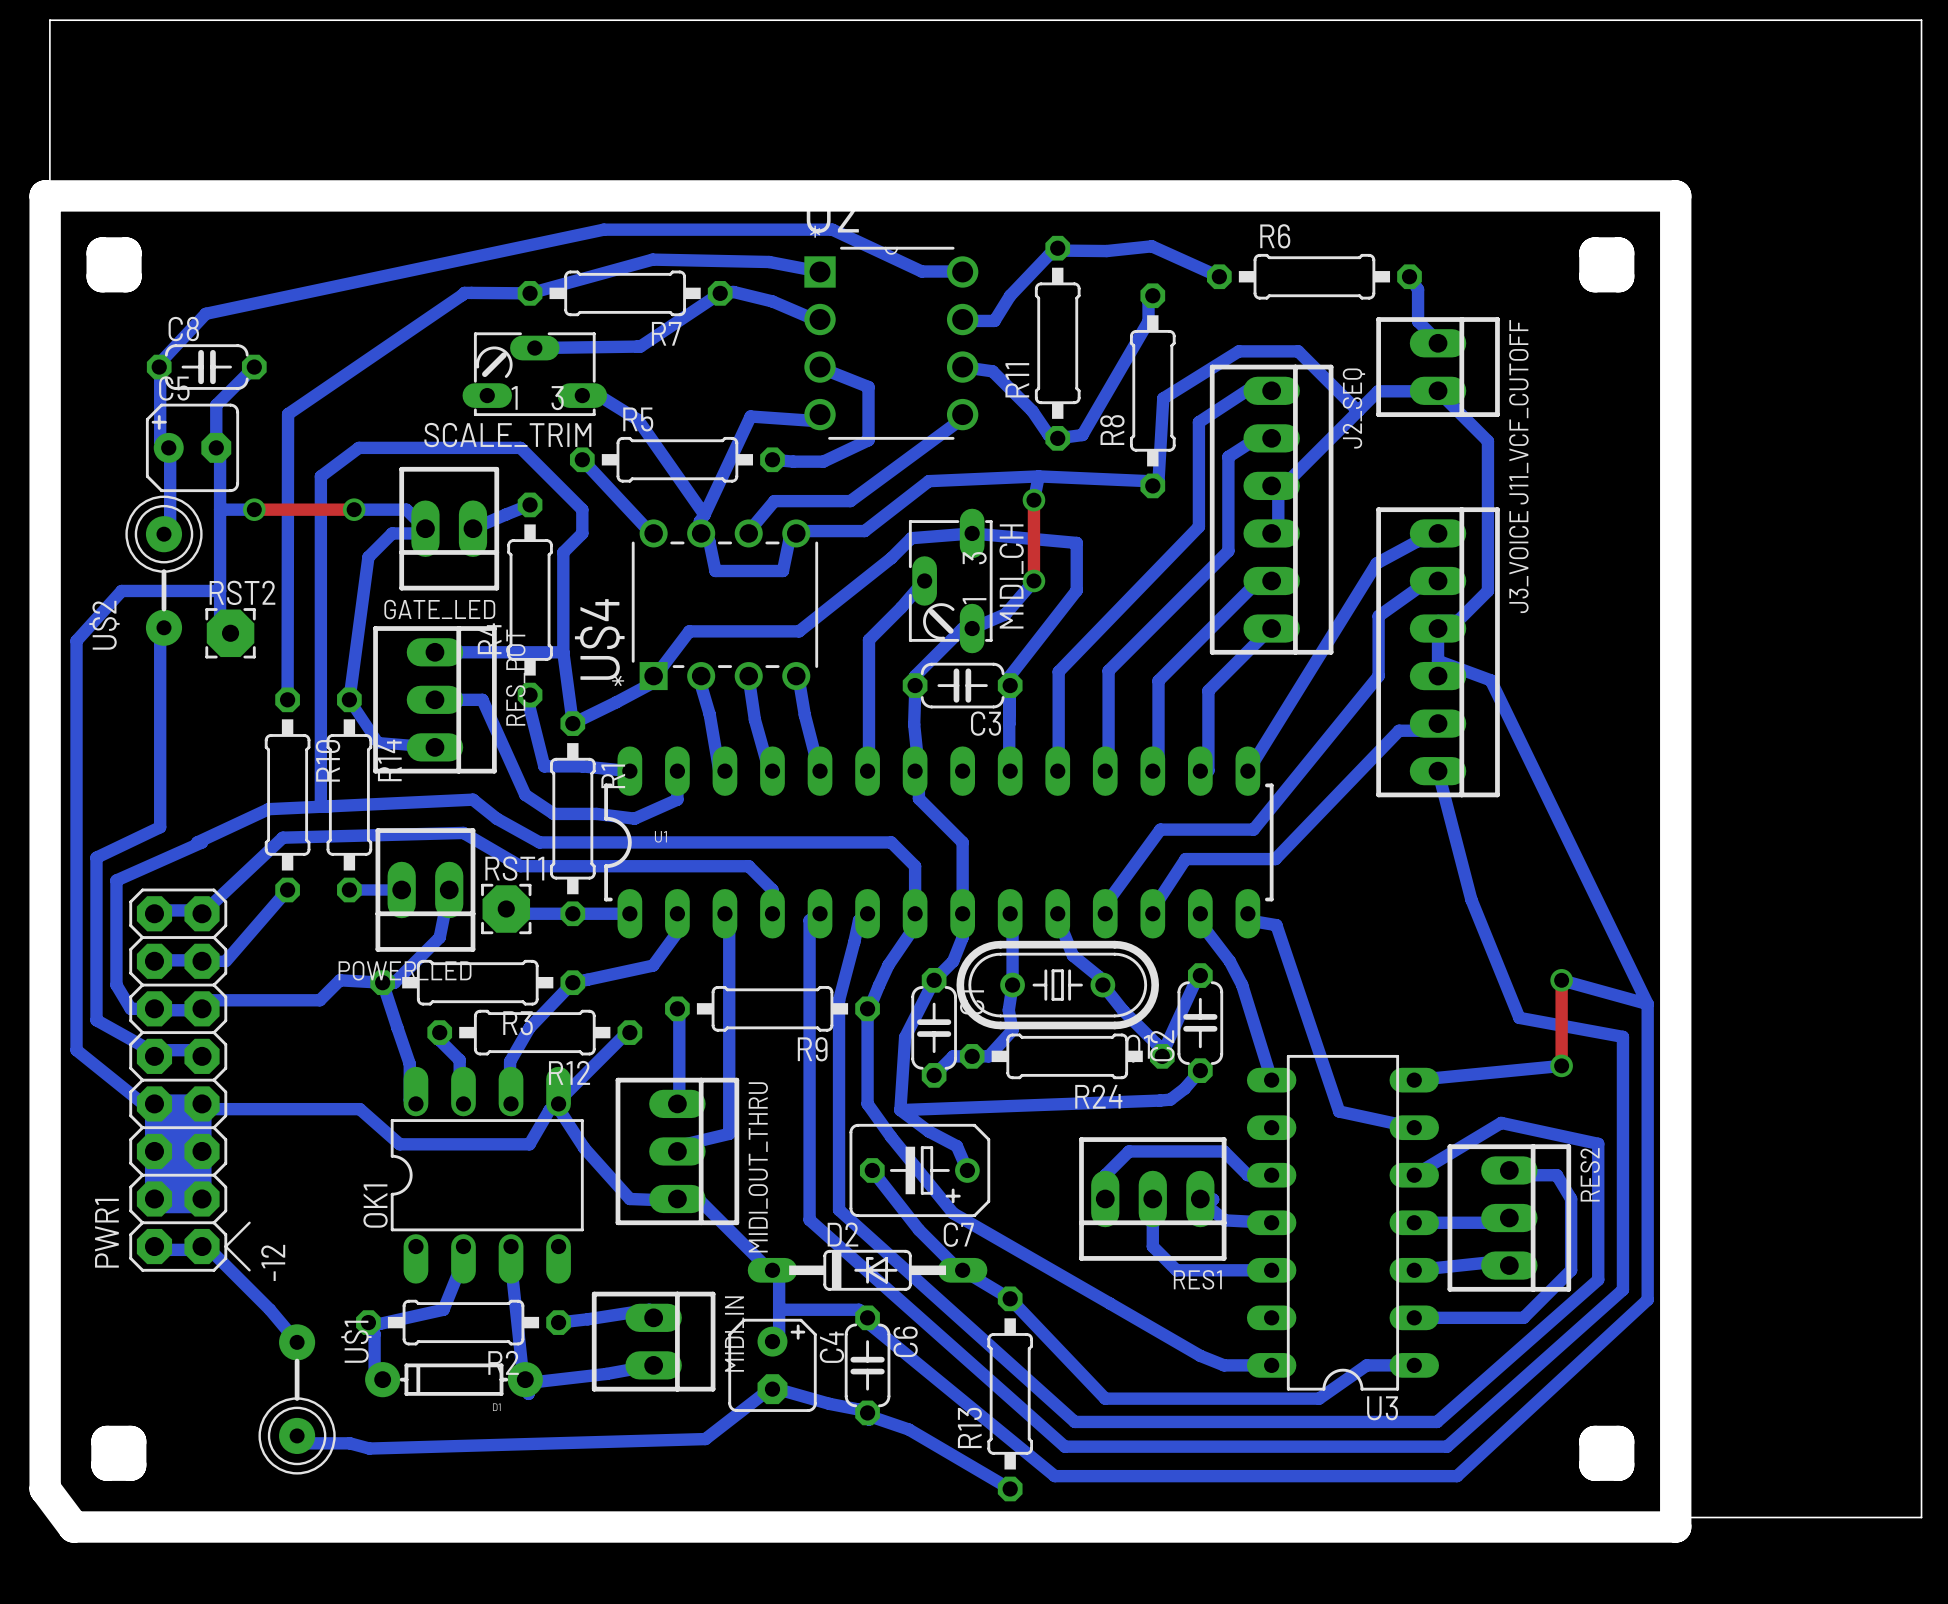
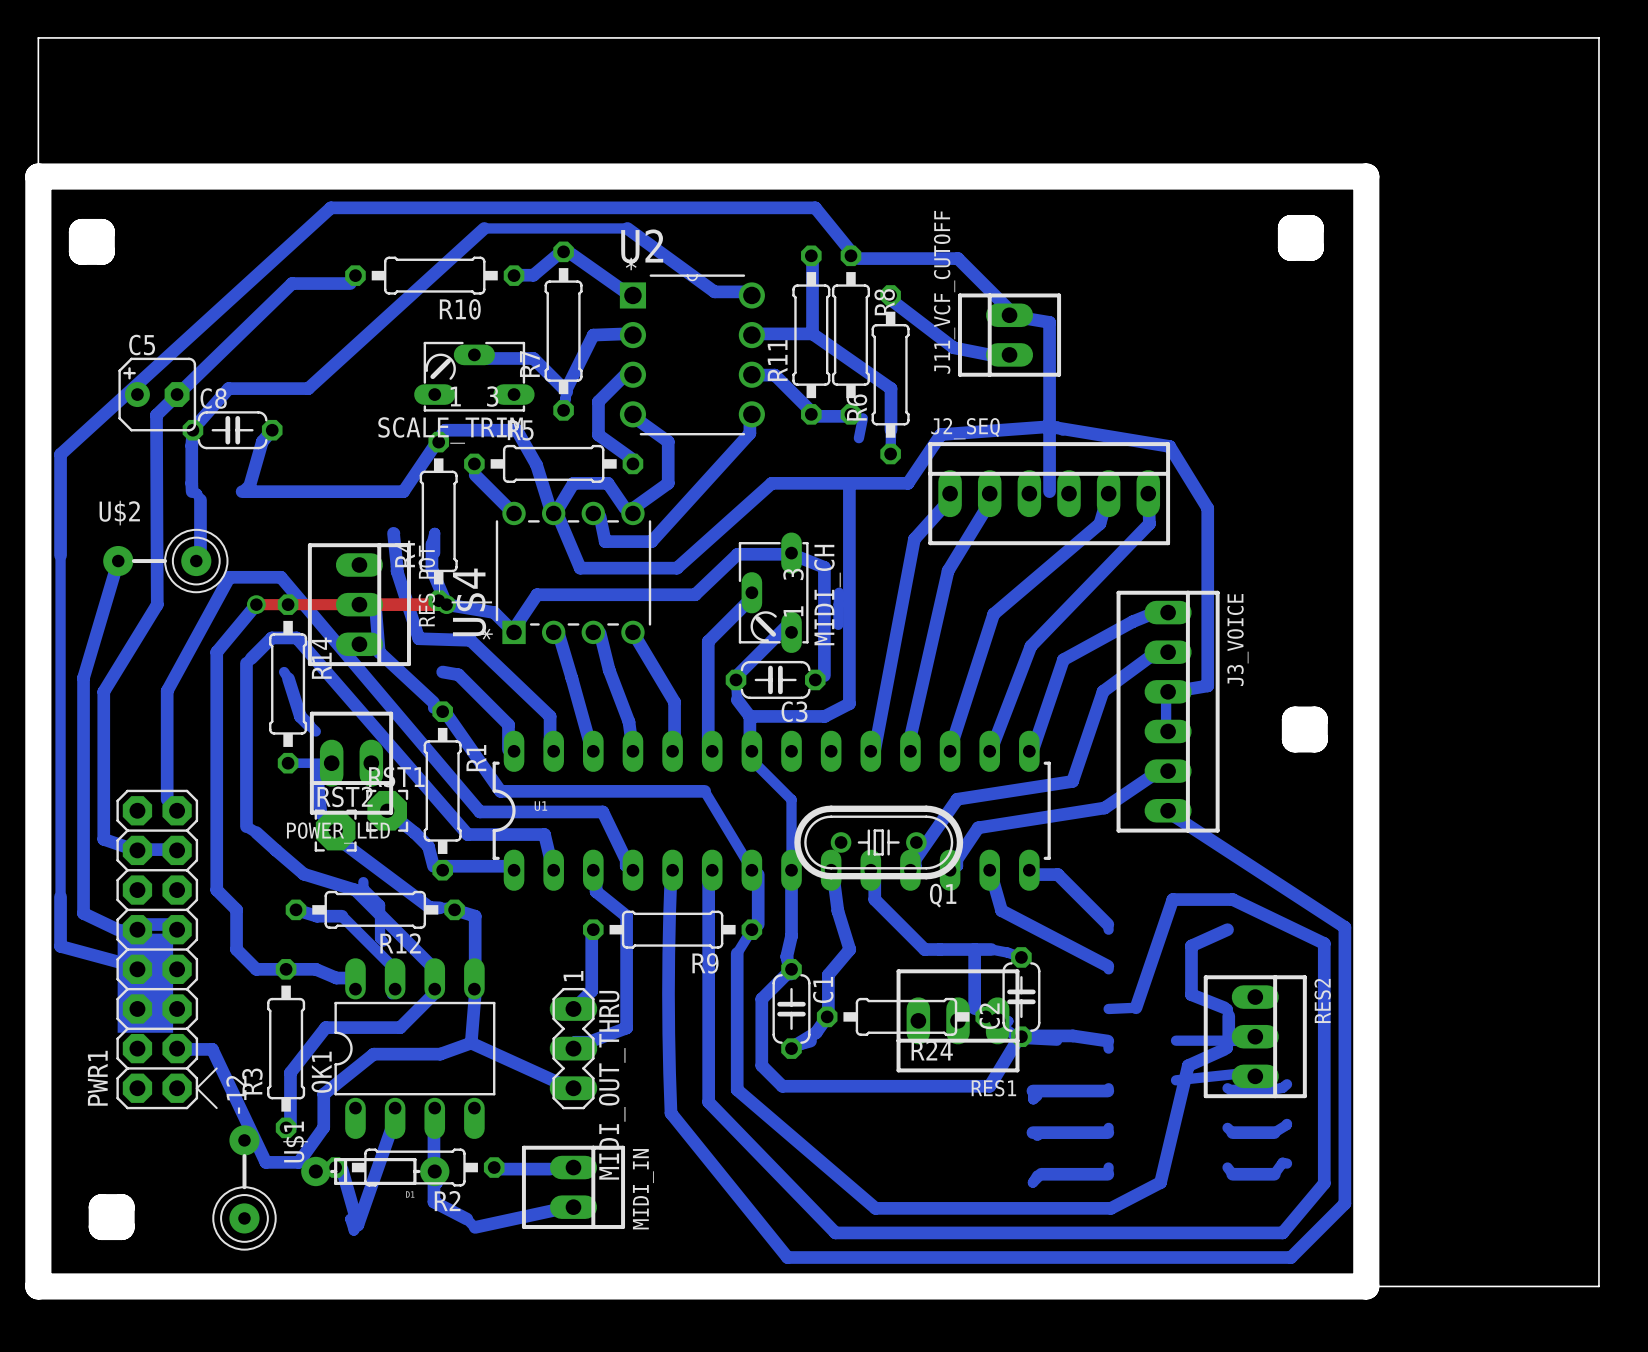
board edge: (45, 195) (1675, 195) (1675, 1527) (73, 1527) (45, 1488) (45, 195) -> (38, 176) (38, 1286) (1366, 1286) (1366, 176) (38, 176)
R6 name position: R6 (1275, 236) -> R6 (856, 407)
board edge: (1594, 252) (1618, 252) (1618, 276) (1594, 276) (1594, 252) -> (1290, 228) (1310, 228) (1310, 247) (1290, 247) (1290, 228)
bottom track: (820, 271) (769, 262) (652, 259) (530, 293) (464, 292) (288, 414) (287, 699) -> none
bottom track: (962, 271) (921, 271) (832, 229) (603, 229) (205, 313) (158, 364) (160, 371) (160, 441) (170, 451) (170, 531) (163, 534) -> none
bottom track: (1219, 276) (1151, 246) (1106, 251) (1058, 250) (1057, 248) (1010, 295) (994, 320) (962, 319) -> none
R6 rotation: 0° (1314, 276) -> 90° clockwise (890, 374)
R6 position: (1314, 276) -> (890, 374)
bottom track: (1409, 276) (1418, 289) (1418, 321) (1438, 343) -> none
bottom track: none -> (811, 255) (812, 333)
R7 rotation: 0° (625, 293) -> 90° clockwise (563, 331)
bottom track: (1152, 295) (1148, 301) (1148, 321) (1082, 435) (1057, 438) (1048, 435) (1032, 411) (992, 371) (962, 367) -> none
bottom track: none -> (355, 275) (350, 283) (292, 283) (156, 415) (157, 604) (103, 691) (103, 839) (137, 850) (177, 850)
bottom track: none -> (514, 275) (533, 275) (563, 251) (571, 253) (632, 295)
bottom track: (820, 319) (819, 321) (772, 301) (733, 291) (720, 293) (640, 346) (534, 348) -> none
bottom track: none -> (751, 295) (749, 291) (714, 291) (627, 228) (484, 228) (308, 388) (228, 388) (199, 421) (192, 430) (191, 445) (192, 491) (196, 493) (200, 499) (200, 566) (196, 561)
bottom track: none -> (890, 295) (891, 300) (953, 347) (1007, 358) (1009, 354)
U2 position: (891, 343) -> (692, 354)
R11 position: (1057, 343) -> (811, 335)
C8 position: (206, 367) -> (232, 430)
bottom track: (254, 367) (216, 405) (216, 447) (220, 451) (220, 640) (230, 650) (230, 633) -> none
bottom track: (820, 367) (868, 387) (868, 440) (823, 461) (772, 459) -> none
J11_VCF_CUTOFF rotation: 0° (1438, 367) -> 180° (1009, 335)
J11_VCF_CUTOFF position: (1438, 367) -> (1009, 335)
SCALE_TRIM position: (534, 374) -> (474, 376)
bottom track: none -> (812, 333) (891, 388) (890, 454)
bottom track: none -> (812, 333) (751, 335)
bottom track: none -> (632, 335) (593, 335) (567, 387) (563, 410) (566, 391) (533, 358) (475, 358) (474, 354)
R8 position: (1152, 390) -> (850, 335)
bottom track: (1271, 390) (1254, 386) (1198, 422) (1198, 526) (1058, 671) (1057, 771) -> none
bottom track: (1438, 391) (1378, 391) (1278, 491) (1278, 531) (1271, 533) -> none
bottom track: (1438, 391) (1487, 441) (1487, 590) (1458, 620) (1438, 620) (1438, 676) -> none
bottom track: (582, 395) (591, 391) (637, 419) (704, 514) -> none
bottom track: (1358, 411) (1298, 351) (1238, 351) (1163, 398) (1158, 481) (1152, 485) (1148, 481) (1038, 476) (928, 481) (864, 531) (799, 531) (789, 541) (782, 571) (715, 571) (709, 541) (701, 533) (699, 521) (704, 514) -> none
bottom track: (820, 414) (819, 421) (750, 416) (704, 514) -> none
bottom track: (962, 414) (958, 421) (850, 501) (774, 501) (748, 533) -> none
bottom track: none -> (632, 374) (625, 375) (598, 401) (598, 434) (633, 459) (633, 466) (632, 463)
bottom track: none -> (751, 374) (774, 375) (808, 408) (811, 414) (816, 416) (849, 416) (850, 414)
R8 name position: R8 (1112, 430) -> R8 (884, 302)
bottom track: (1271, 438) (1268, 431) (1228, 456) (1228, 551) (1108, 670) (1108, 770) (1105, 771) -> none
bottom track: (582, 459) (649, 531) (653, 533) -> none
R5 position: (677, 459) -> (553, 463)
bottom track: none -> (632, 414) (633, 416) (668, 441) (668, 483) (633, 508) (632, 513) (625, 508) (607, 483) (573, 483) (553, 513)
bottom track: none -> (751, 414) (749, 416) (749, 433) (651, 541) (605, 541) (600, 516) (593, 513)
bottom track: none -> (272, 430) (262, 441) (250, 483) (242, 491) (403, 491) (445, 430) (516, 430) (536, 465) (550, 508) (553, 513)
top track: (1033, 500) (1033, 580) -> none
via: (1033, 500) -> none
bottom track: (530, 504) (472, 528) -> none
bottom track: (220, 509) (254, 509) -> none
top track: (254, 509) (354, 509) -> none
via: (254, 509) -> none
bottom track: (354, 509) (406, 509) (425, 528) (415, 533) (392, 533) (368, 557) (349, 699) (377, 742) (434, 747) -> none
via: (354, 509) -> none
J2_SEQ rotation: 0° (1271, 509) -> 90° counterclockwise (1049, 493)
GATE_LED: (449, 528) -> none
bottom track: none -> (474, 463) (475, 475) (514, 513)
bottom track: (1438, 533) (1438, 541) (1418, 541) (1376, 563) (1247, 771) -> none
bottom track: none -> (849, 483) (849, 703) (824, 716) (749, 716)
bottom track: none -> (950, 493) (949, 499) (914, 539) (874, 749) (870, 751)
bottom track: none -> (989, 493) (991, 499) (948, 570) (908, 745) (910, 751)
bottom track: none -> (1108, 493) (1099, 523) (993, 614) (950, 751)
bottom track: none -> (1148, 493) (1149, 523) (1030, 646) (989, 751)
U$2 rotation: 0° (163, 570) -> 90° clockwise (165, 561)
bottom track: (924, 580) (868, 639) (867, 771) -> none
MIDI_CH position: (950, 580) -> (773, 592)
bottom track: (1033, 580) (1005, 614) (972, 628) (962, 628) (915, 676) (914, 724) (918, 770) -> none
via: (1033, 580) -> none
bottom track: (1271, 580) (1258, 580) (1158, 680) (1158, 770) (1152, 771) -> none
bottom track: (1438, 580) (1428, 580) (1378, 616) (1378, 676) (1253, 829) (1160, 829) (1108, 900) (1108, 910) (1105, 913) -> none
bottom track: (220, 590) (121, 590) (76, 640) -> (1049, 491) (1049, 322) (1009, 315) (1007, 308) (958, 258) (858, 258) (850, 255) (849, 250) (815, 207) (330, 207) (60, 454) (60, 555)
bottom track: none -> (553, 513) (558, 516) (580, 568) (676, 568) (771, 483) (908, 483) (940, 434) (1049, 426) (1169, 446) (1207, 508) (1207, 685) (1168, 691) (1166, 699) (1166, 724) (1168, 731)
U$4 position: (724, 604) -> (573, 572)
bottom track: none -> (395, 533) (393, 533) (397, 571) (418, 638) (470, 640) (550, 716) (550, 749) (553, 751)
bottom track: (163, 627) (160, 630) (160, 827) (96, 857) (96, 1020) (150, 1050) (154, 1056) (160, 1050) (200, 1050) (202, 1056) -> none
bottom track: (1271, 628) (1208, 690) (1208, 770) (1200, 771) -> none
RST2 position: (230, 633) -> (335, 830)
bottom track: none -> (434, 553) (434, 533) (431, 544) (431, 569) (446, 604) (494, 612) (514, 632) (516, 624) (537, 594) (695, 594) (737, 554) (791, 554) (824, 567) (824, 675) (815, 679)
bottom track: none -> (118, 561) (83, 677) (83, 913) (117, 929) (137, 929) (142, 924) (175, 924) (177, 929) (183, 924)
bottom track: (434, 652) (563, 652) -> none
bottom track: (563, 652) (572, 723) (652, 683) (649, 670) (653, 676) (659, 670) (689, 631) (799, 631) (891, 558) (911, 538) (972, 533) (1076, 542) (1076, 590) (1009, 677) (1009, 775) (1010, 771) -> none
bottom track: (563, 652) (563, 552) (582, 533) (582, 509) (520, 447) (358, 447) (320, 476) (320, 805) (330, 806) -> none
J3_VOICE position: (1438, 652) -> (1168, 711)
bottom track: (1438, 660) (1490, 680) (1647, 1004) -> none
bottom track: (701, 676) (699, 680) (709, 714) (719, 770) (724, 771) -> none
bottom track: (748, 676) (754, 719) (769, 770) (772, 771) -> none
bottom track: (796, 676) (799, 680) (804, 715) (820, 771) -> none
bottom track: none -> (751, 592) (749, 599) (708, 641) (708, 749) (712, 751)
C3 position: (962, 685) -> (775, 679)
bottom track: (530, 695) (530, 709) (544, 766) (582, 766) (629, 771) -> none
bottom track: none -> (256, 604) (216, 652) (216, 890) (236, 909) (236, 949) (256, 969) (315, 969) (336, 978) (354, 978) (355, 989)
top track: none -> (256, 604) (351, 604)
via: none -> (256, 604)
bottom track: (453, 699) (482, 699) (525, 794) (553, 813) (596, 813) (634, 818) (677, 799) (677, 771) -> (375, 604) (379, 652) (433, 702) (433, 708) (445, 712) (500, 791) (704, 791) (751, 870) (758, 874) (758, 924) (751, 929) (737, 953) (737, 1089) (875, 1208) (1111, 1208) (1160, 1182) (1188, 1065) (1227, 1048) (1228, 1041) (1227, 1008) (1191, 994) (1191, 945) (1227, 929)
top track: none -> (375, 604) (446, 604)
via: none -> (446, 604)
bottom track: none -> (1168, 612) (1166, 608) (1132, 621) (1063, 659) (1032, 749) (1029, 751)
bottom track: (1438, 723) (1438, 730) (1399, 730) (1275, 859) (1185, 859) (1158, 900) (1158, 910) (1152, 913) -> none
bottom track: none -> (553, 632) (558, 633) (593, 751)
bottom track: none -> (593, 632) (600, 633) (609, 670) (628, 721) (632, 751)
bottom track: none -> (632, 632) (674, 702) (674, 749) (672, 751)
bottom track: none -> (791, 632) (791, 621) (733, 679) (736, 679) (737, 699) (749, 716)
bottom track: none -> (1168, 652) (1166, 658) (1149, 658) (1152, 654) (1103, 691) (1072, 781) (957, 799) (916, 857) (916, 866) (910, 870)
bottom track: (918, 770) (918, 798) (962, 842) (962, 937) (953, 961) (934, 980) (905, 1037) (900, 1110) -> none
bottom track: (1438, 771) (1471, 899) (1519, 1017) (1622, 1036) (1622, 1289) (1447, 1446) (1064, 1446) (809, 1219) (809, 920) (820, 913) -> none
bottom track: none -> (284, 672) (288, 678) (300, 716) (315, 731)
bottom track: none -> (442, 672) (458, 674) (508, 724) (508, 749) (514, 751)
R10 rotation: 0° (287, 794) -> 90° clockwise (434, 275)
R10 position: (287, 794) -> (434, 275)
R1 position: (572, 818) -> (442, 790)
bottom track: none -> (749, 716) (749, 749) (751, 751) (749, 758) (791, 799) (791, 936) (786, 956) (790, 974) (791, 969) (761, 999) (761, 1065) (782, 1086) (989, 1086) (1019, 1036) (1027, 1035) (1021, 1036) (1018, 1035) (1072, 1035) (1107, 1041) (1108, 1048)
board edge: none -> (1294, 719) (1314, 719) (1314, 739) (1294, 739) (1294, 719)
U1 position: (938, 842) -> (771, 810)
bottom track: (287, 889) (225, 961) (154, 961) -> none
bottom track: (449, 889) (439, 937) (394, 982) (382, 982) -> none
bottom track: none -> (315, 771) (320, 813) (335, 830) (336, 838) (429, 907) (447, 907) (475, 916) (475, 994) (471, 1043)
bottom track: none -> (1168, 771) (1166, 766) (1104, 807) (978, 827) (958, 857) (958, 866) (950, 870)
bottom track: (506, 909) (511, 913) (629, 913) -> none
RST1 position: (506, 909) -> (387, 810)
bottom track: (154, 913) (160, 910) (200, 910) (202, 913) (282, 837) (463, 832) (520, 866) (748, 866) (772, 889) (772, 913) -> none
bottom track: (677, 913) (678, 930) (653, 965) (572, 982) (529, 1027) (510, 1061) (511, 1103) -> none
bottom track: (724, 913) (729, 920) (729, 1133) (679, 1145) (677, 1151) -> none
bottom track: (867, 913) (859, 920) (839, 1000) (839, 1209) (1074, 1421) (1437, 1421) (1598, 1279) (1598, 1143) (1501, 1122) (1414, 1175) -> none
bottom track: (1010, 913) (1012, 916) (1012, 985) (1008, 1010) (1012, 1030) (988, 1056) (953, 1056) (934, 1075) -> none
bottom track: (1057, 913) (1072, 955) (1098, 976) (1102, 985) (1122, 1010) (1157, 1044) -> none
bottom track: (1200, 913) (1198, 920) (1229, 961) (1242, 985) (1271, 1080) -> none
bottom track: (1247, 913) (1248, 920) (1276, 925) (1339, 1111) (1414, 1127) -> none
bottom track: none -> (177, 810) (167, 799) (167, 691) (229, 577) (280, 577) (479, 811) (602, 811) (625, 857) (625, 866) (632, 870)
bottom track: none -> (387, 810) (428, 846) (433, 866) (442, 870) (441, 866) (508, 866) (514, 870)
bottom track: none -> (1168, 810) (1344, 927) (1344, 1203) (1290, 1257) (787, 1257) (671, 1113) (668, 993) (669, 914) (672, 870)
bottom track: (1200, 975) (1198, 975) (1162, 1054) (1157, 1044) -> none
bottom track: (1561, 980) (1647, 1004) -> none
top track: (1561, 980) (1561, 1065) -> none
via: (1561, 980) -> none
bottom track: (382, 982) (409, 1063) (409, 1100) (415, 1103) -> none
bottom track: (382, 982) (339, 980) (319, 1000) (210, 1000) (200, 1010) (130, 1008) (116, 985) (116, 880) (202, 842) (197, 842) (268, 809) (472, 799) (496, 818) (539, 842) (891, 842) (915, 866) (915, 913) (918, 920) (888, 965) (868, 1009) (867, 1008) (867, 1103) (891, 1137) (953, 1213) (1200, 1355) (1224, 1365) (1271, 1365) -> none
R3 rotation: 0° (477, 982) -> 90° clockwise (286, 1048)
R3 position: (477, 982) -> (286, 1048)
bottom track: (1647, 1004) (1647, 1299) (1457, 1476) (1054, 1476) (869, 1324) (868, 1319) (859, 1309) (779, 1309) -> none
bottom track: (677, 1008) (679, 1010) (679, 1100) (677, 1103) -> none
R9 position: (772, 1008) -> (672, 929)
bottom track: none -> (553, 870) (550, 866) (544, 834) (467, 834) (296, 637) (271, 637) (246, 663) (246, 826) (256, 832) (303, 874) (355, 890) (434, 969) (433, 994) (400, 1027) (325, 1027) (290, 1072) (290, 1127) (286, 1127)
bottom track: none -> (593, 870) (596, 866) (596, 891) (626, 916) (626, 1027) (591, 1041) (575, 1041) (573, 1048)
bottom track: none -> (712, 870) (708, 882) (708, 1102) (835, 1232) (1282, 1232) (1324, 1183) (1324, 943) (1232, 899) (1172, 899) (1135, 1007) (1108, 1008)
bottom track: none -> (831, 870) (837, 911) (849, 949) (828, 974) (828, 1016) (816, 1032) (795, 1045) (810, 1041) (791, 1048)
bottom track: none -> (870, 870) (874, 874) (874, 899) (924, 949) (991, 949) (1021, 957)
bottom track: none -> (989, 870) (1001, 910) (1107, 966) (1108, 969)
bottom track: none -> (1029, 870) (1032, 874) (1057, 874) (1107, 924) (1108, 929)
C2 position: (1200, 1023) -> (1021, 997)
C1 position: (934, 1027) -> (791, 1008)
R12 position: (534, 1032) -> (375, 909)
bottom track: (629, 1032) (629, 1030) (559, 1100) (558, 1103) -> none
bottom track: (76, 1050) (149, 1109) (359, 1109) (399, 1144) (529, 1144) (549, 1110) (558, 1103) -> (60, 896) (60, 946) (133, 966) (137, 969)
R24 position: (1067, 1056) -> (906, 1016)
bottom track: none -> (296, 909) (317, 916) (341, 916) (395, 969) (395, 989) (391, 994)
bottom track: (1561, 1065) (1414, 1080) -> none
via: (1561, 1065) -> none
bottom track: (1200, 1070) (1184, 1088) (1170, 1099) (900, 1110) -> none
PWR1 position: (190, 1080) -> (167, 949)
bottom track: none -> (593, 929) (591, 932) (591, 991) (573, 1008)
bottom track: (558, 1103) (559, 1110) (584, 1148) (629, 1198) (699, 1199) (769, 1269) (772, 1270) (779, 1279) (779, 1339) (772, 1341) -> none
bottom track: (900, 1110) (928, 1131) (956, 1146) (967, 1170) -> none
bottom track: none -> (974, 949) (974, 1008) (985, 1016)
MIDI_OUT_THRU: (677, 1151) -> none
bottom track: (872, 1170) (918, 1229) (958, 1269) (1010, 1298) (1105, 1398) (1319, 1398) (1366, 1365) (1414, 1365) -> none
C7: (919, 1170) -> none
bottom track: (1509, 1170) (1514, 1175) (1556, 1175) (1571, 1198) (1571, 1270) (1523, 1317) (1414, 1317) -> none
OK1 position: (487, 1175) -> (414, 1048)
bottom track: (1271, 1175) (1247, 1175) (1224, 1151) (1129, 1151) (1105, 1175) (1105, 1198) -> none
bottom track: (1152, 1198) (1152, 1246) (1176, 1270) (1271, 1270) -> none
U3: (1342, 1222) -> none
bottom track: none -> (471, 1043) (558, 1082) (566, 1082) (573, 1088)
bottom track: none -> (471, 1043) (440, 1054) (373, 1054) (323, 1094) (323, 1127) (298, 1162) (265, 1162) (212, 1049) (177, 1048)
MIDI_OUT_THRU: none -> (573, 1048)
bottom track: (154, 1246) (160, 1249) (200, 1249) (202, 1246) (210, 1249) (270, 1309) (297, 1342) -> none
bottom track: (463, 1246) (459, 1249) (459, 1269) (443, 1309) (379, 1324) (368, 1322) (374, 1334) (374, 1374) (382, 1379) -> none
bottom track: (511, 1246) (509, 1249) (523, 1383) (606, 1373) (653, 1365) -> none
D2: (867, 1270) -> none
bottom track: none -> (1287, 1084) (1282, 1087) (1266, 1091) (1232, 1091) (1227, 1088)
bottom track: none -> (1108, 1088) (1107, 1091) (1032, 1091) (1033, 1099) (1037, 1096)
bottom track: none -> (395, 1108) (391, 1110) (391, 1127) (357, 1225)
bottom track: none -> (434, 1108) (433, 1202) (466, 1219) (475, 1227) (573, 1207)
bottom track: (653, 1317) (649, 1309) (558, 1322) -> none
R2 position: (463, 1322) -> (414, 1167)
bottom track: none -> (1287, 1123) (1274, 1132) (1232, 1132) (1227, 1127)
bottom track: none -> (1108, 1127) (1107, 1132) (1032, 1132) (1037, 1135)
MIDI_IN position: (653, 1341) -> (573, 1187)
C4: (772, 1365) -> none
C6: (867, 1365) -> none
bottom track: none -> (1287, 1163) (1282, 1162) (1274, 1174) (1232, 1174) (1227, 1167)
bottom track: none -> (335, 1167) (341, 1169) (357, 1225)
bottom track: none -> (494, 1167) (500, 1169) (550, 1169) (566, 1165) (573, 1167)
bottom track: none -> (1108, 1167) (1107, 1174) (1041, 1174) (1032, 1182) (1037, 1175)
R13: (1010, 1393) -> none
bottom track: (297, 1435) (299, 1443) (349, 1443) (369, 1448) (705, 1439) (769, 1389) (779, 1389) (829, 1403) (859, 1409) (867, 1412) (868, 1419) (865, 1414) (908, 1429) (1010, 1488) -> none
board edge: (106, 1441) (130, 1441) (130, 1465) (106, 1465) (106, 1441) -> (101, 1207) (121, 1207) (121, 1226) (101, 1226) (101, 1207)
board edge: (1594, 1441) (1594, 1465) (1618, 1465) (1618, 1441) (1594, 1441) -> none
bottom track: none -> (357, 1225) (353, 1230) (350, 1219) (355, 1226)

